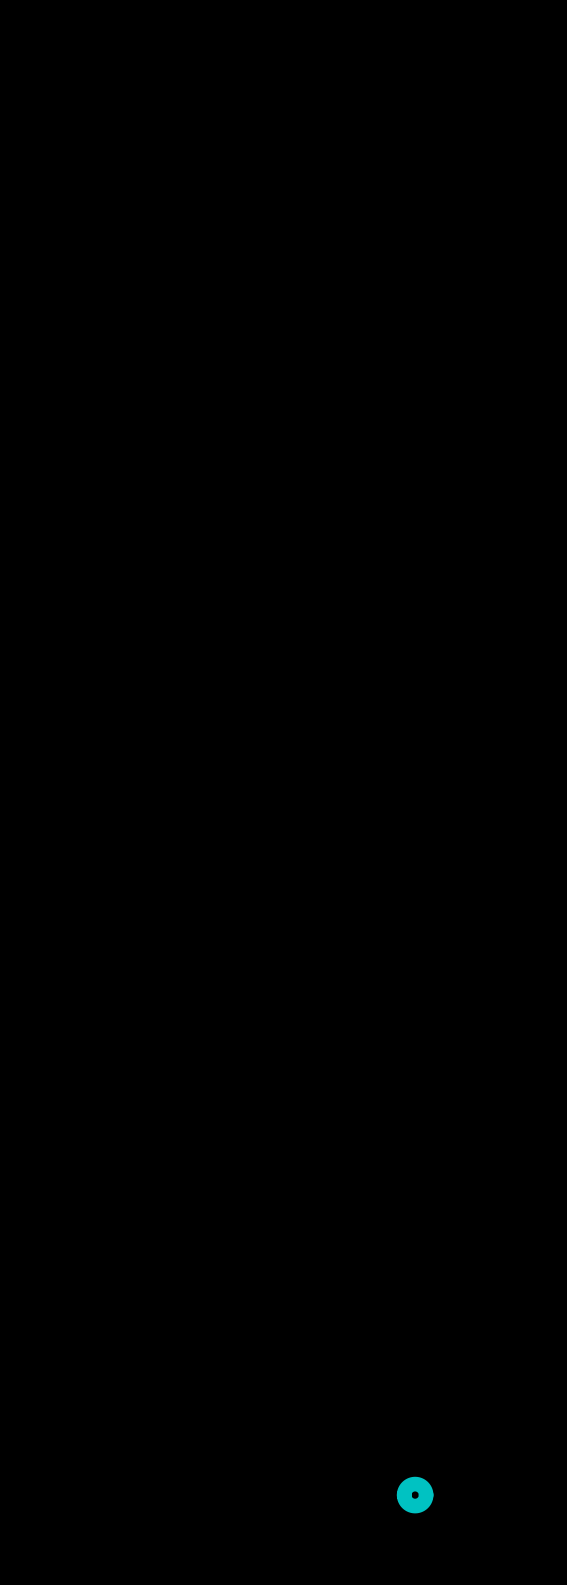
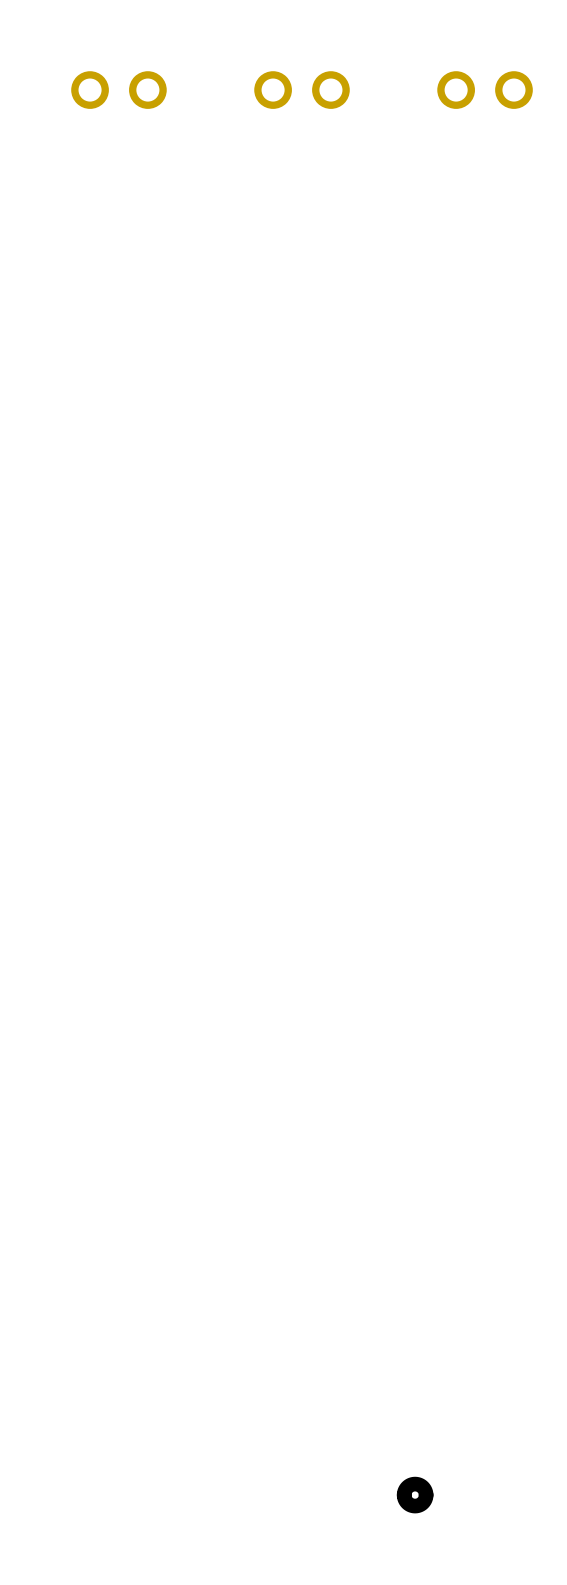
part: none -> (118, 90)
part: none -> (302, 90)
part: none -> (485, 90)

